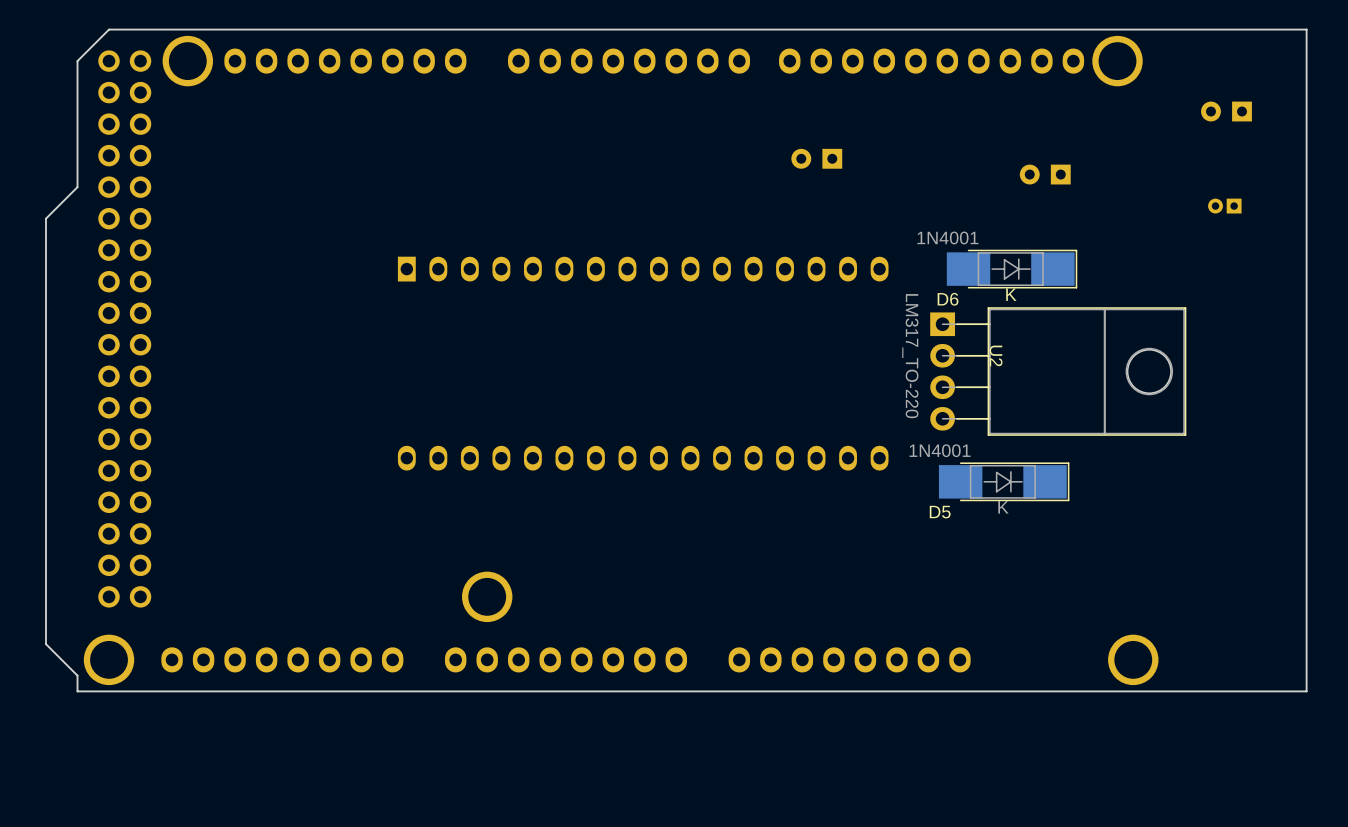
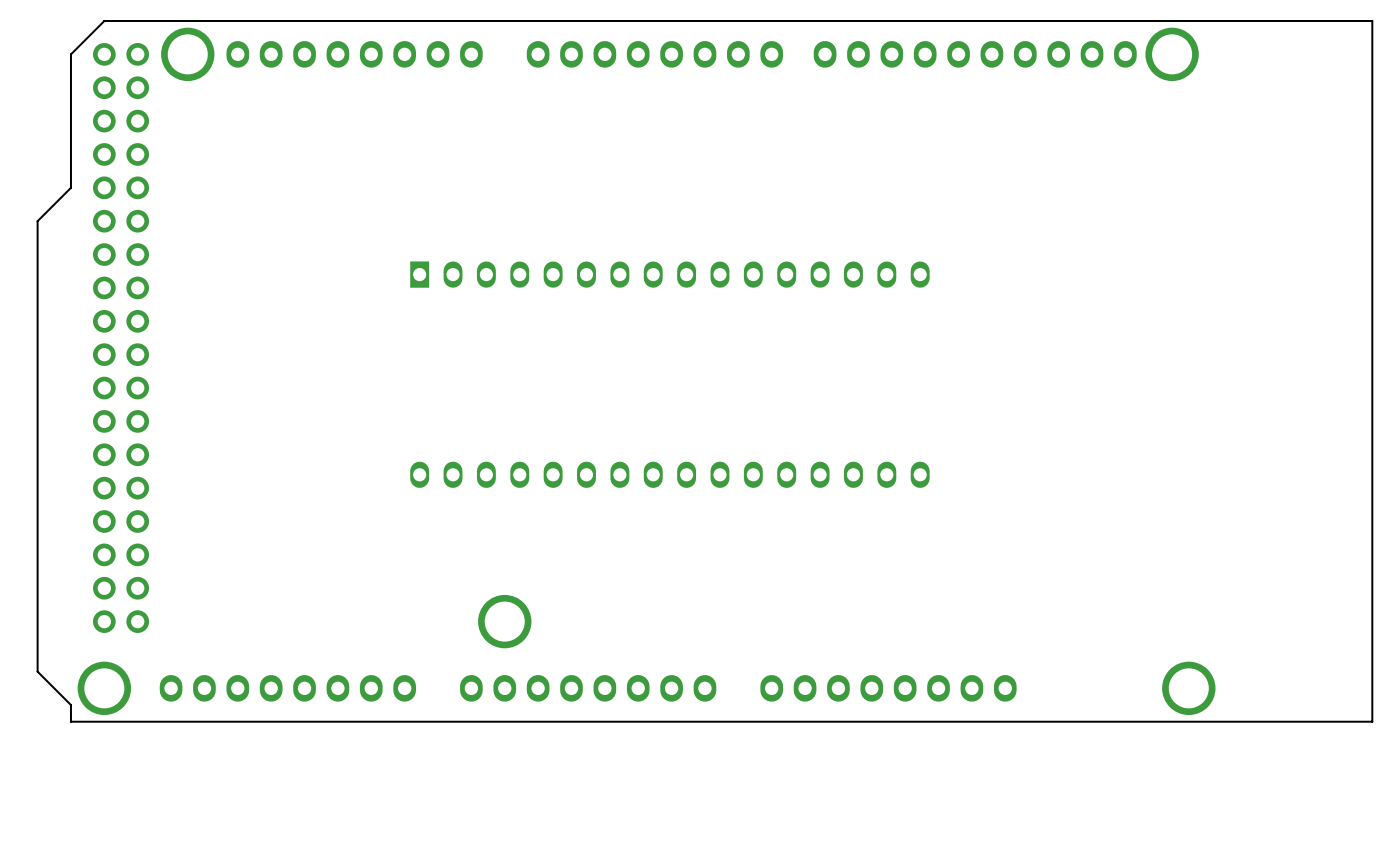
part: (1226, 111) -> none
part: (816, 158) -> none
part: (1045, 174) -> none
part: (1224, 206) -> none
D6: 1N4001 (1012, 269) -> none
U2: LM317_TO-220 (1058, 371) -> none
D5: 1N4001 (1004, 481) -> none

